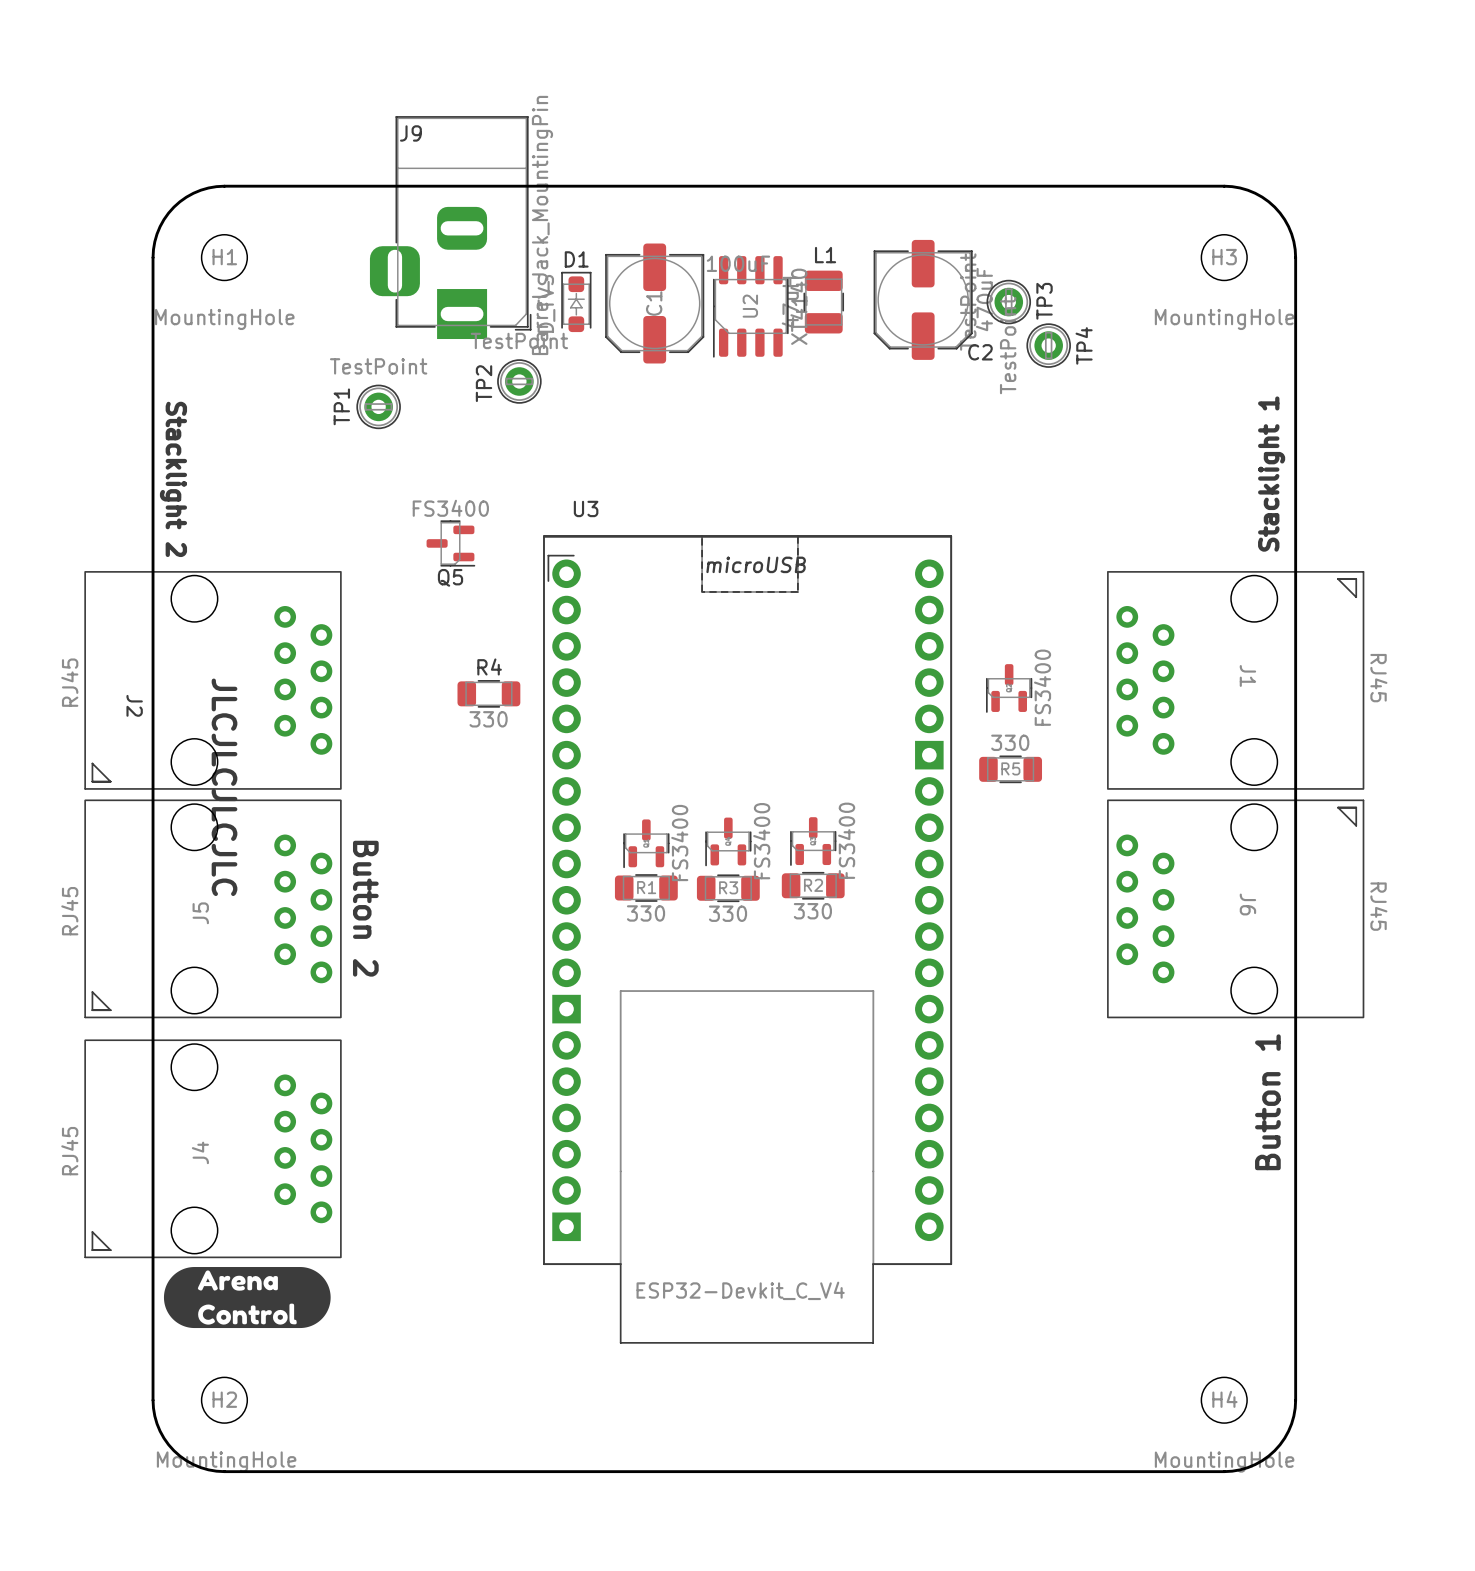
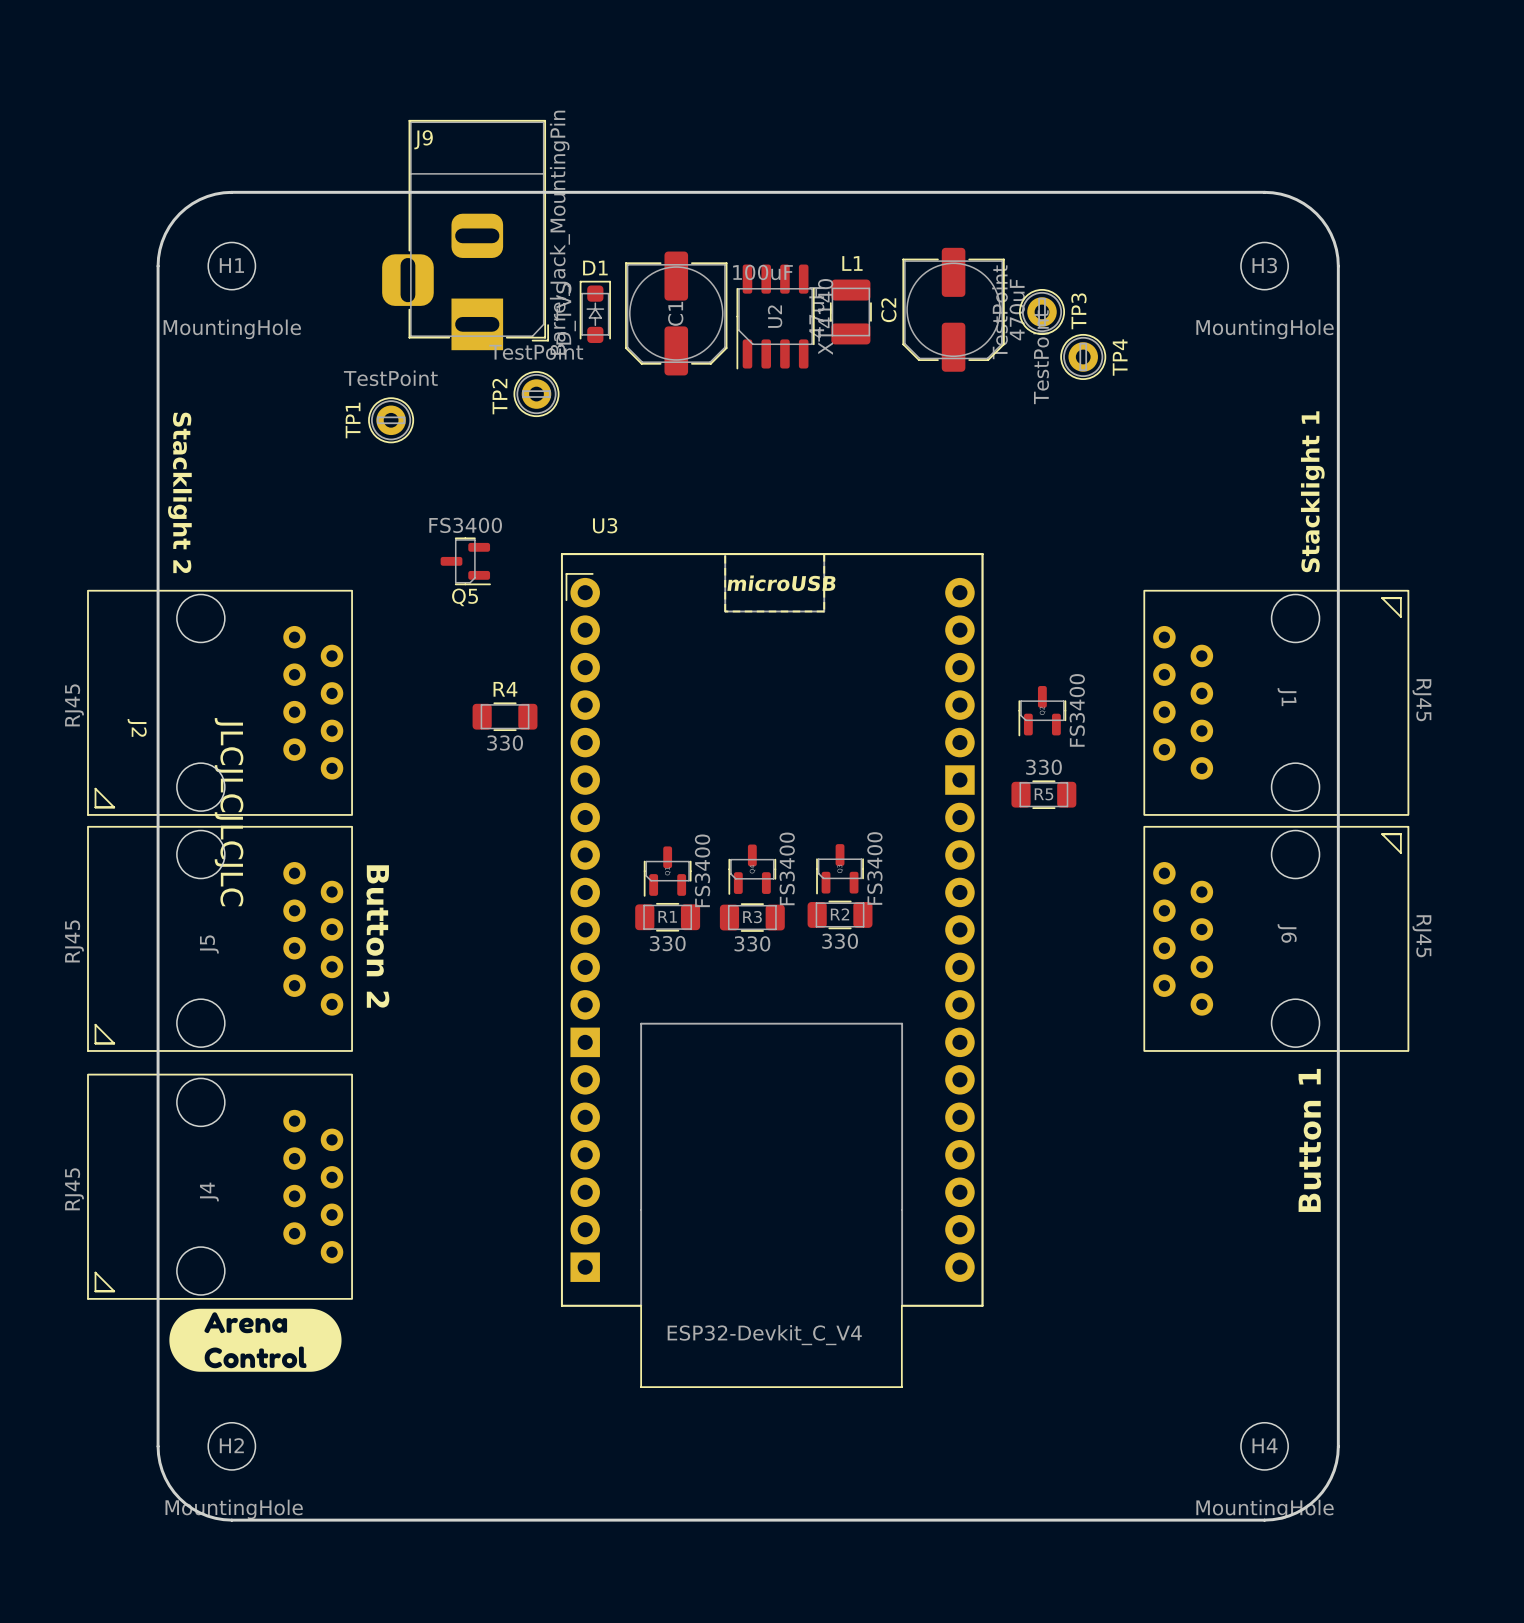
C2 name rotation: 0° (980, 352) -> 90° counterclockwise (888, 310)
C2 name position: C2 (980, 352) -> C2 (888, 310)

